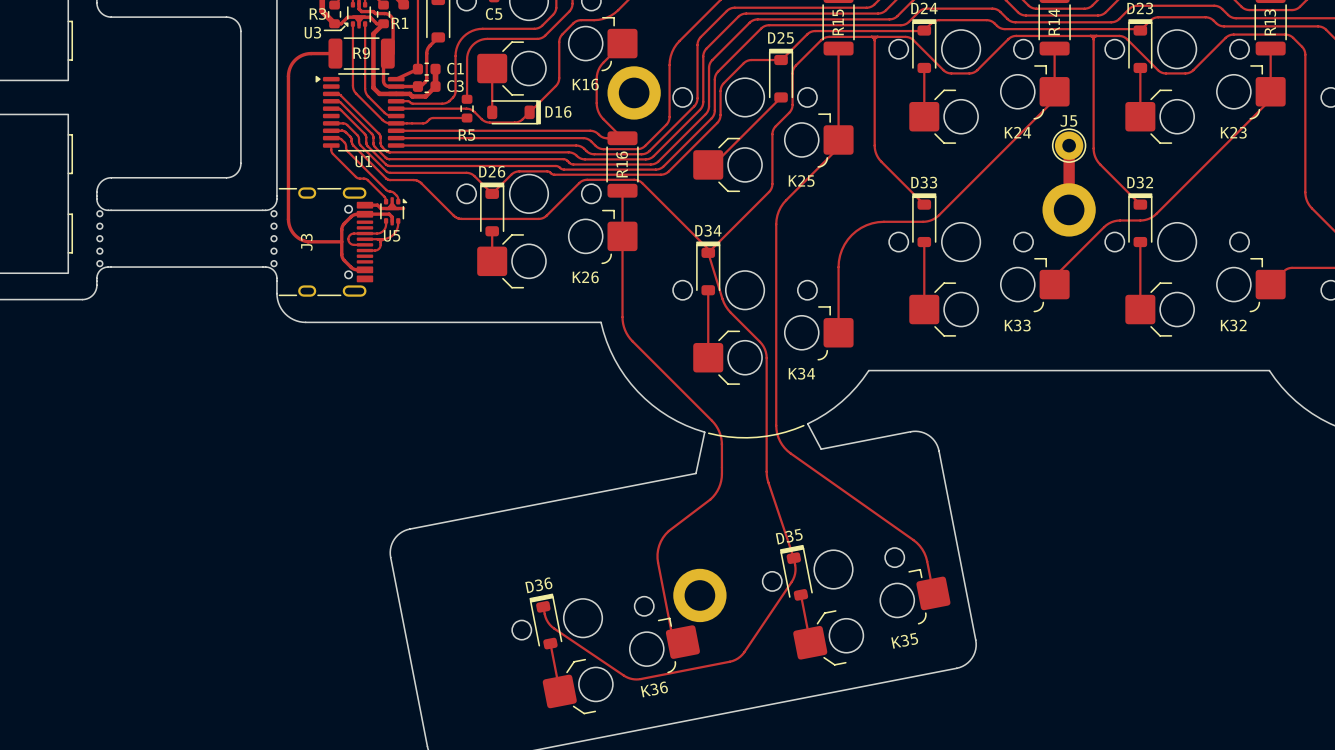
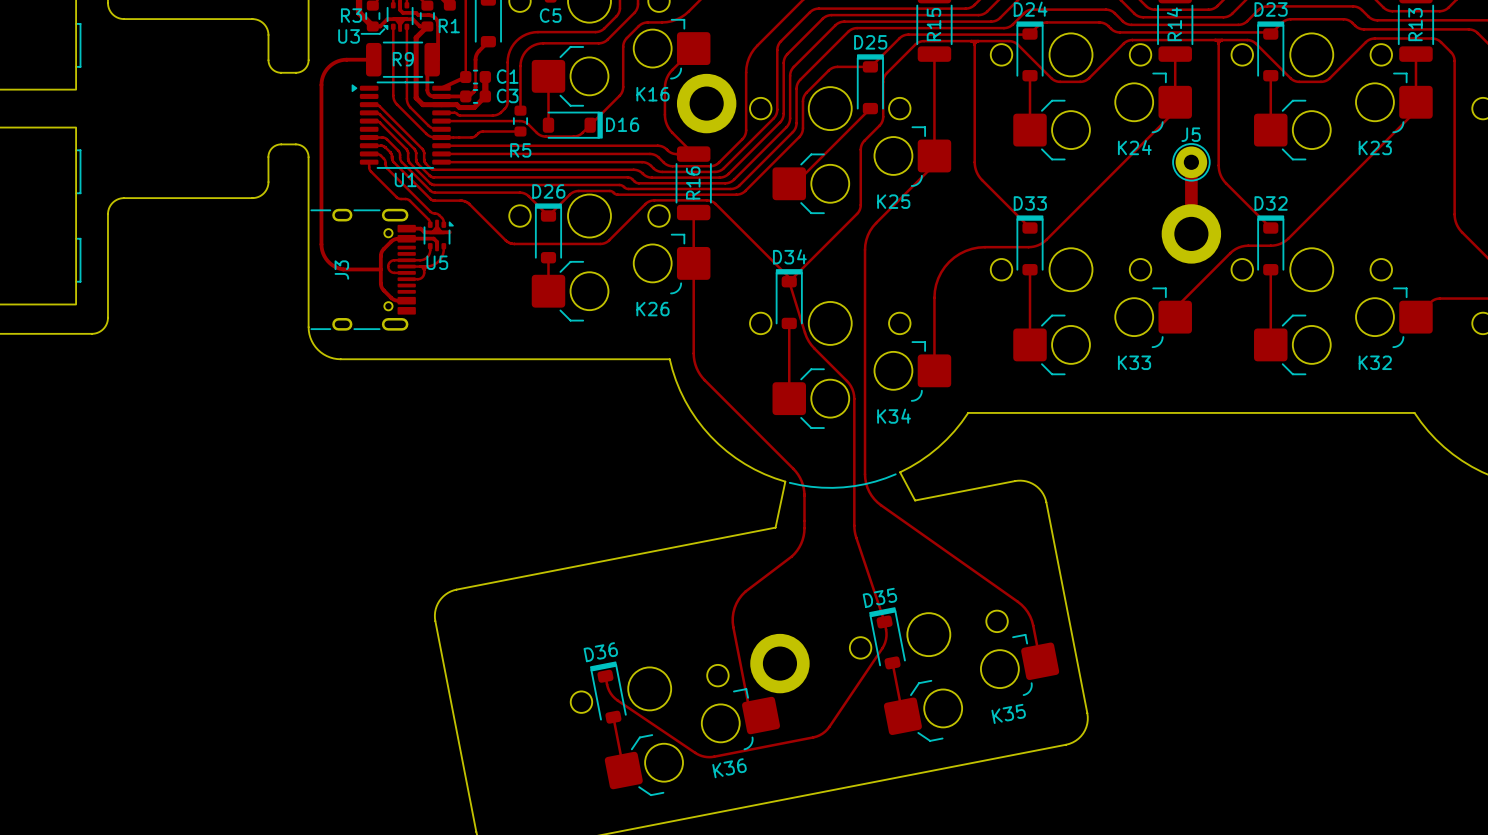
board edge: (276, 53) (276, 196) -> none
board edge: (240, 54) (240, 163) -> (268, 60) (270, 66) (276, 71) (295, 72) (304, 69) (308, 60)
board edge: none -> (107, 218) (107, 313)
board edge: (111, 210) (262, 210) -> none
part: (103, 238) -> none
part: (269, 238) -> none
board edge: (111, 267) (262, 267) -> none
board edge: (276, 281) (276, 293) -> (268, 182) (268, 155) (272, 148) (279, 144) (295, 144) (304, 148) (308, 157) (308, 327)

